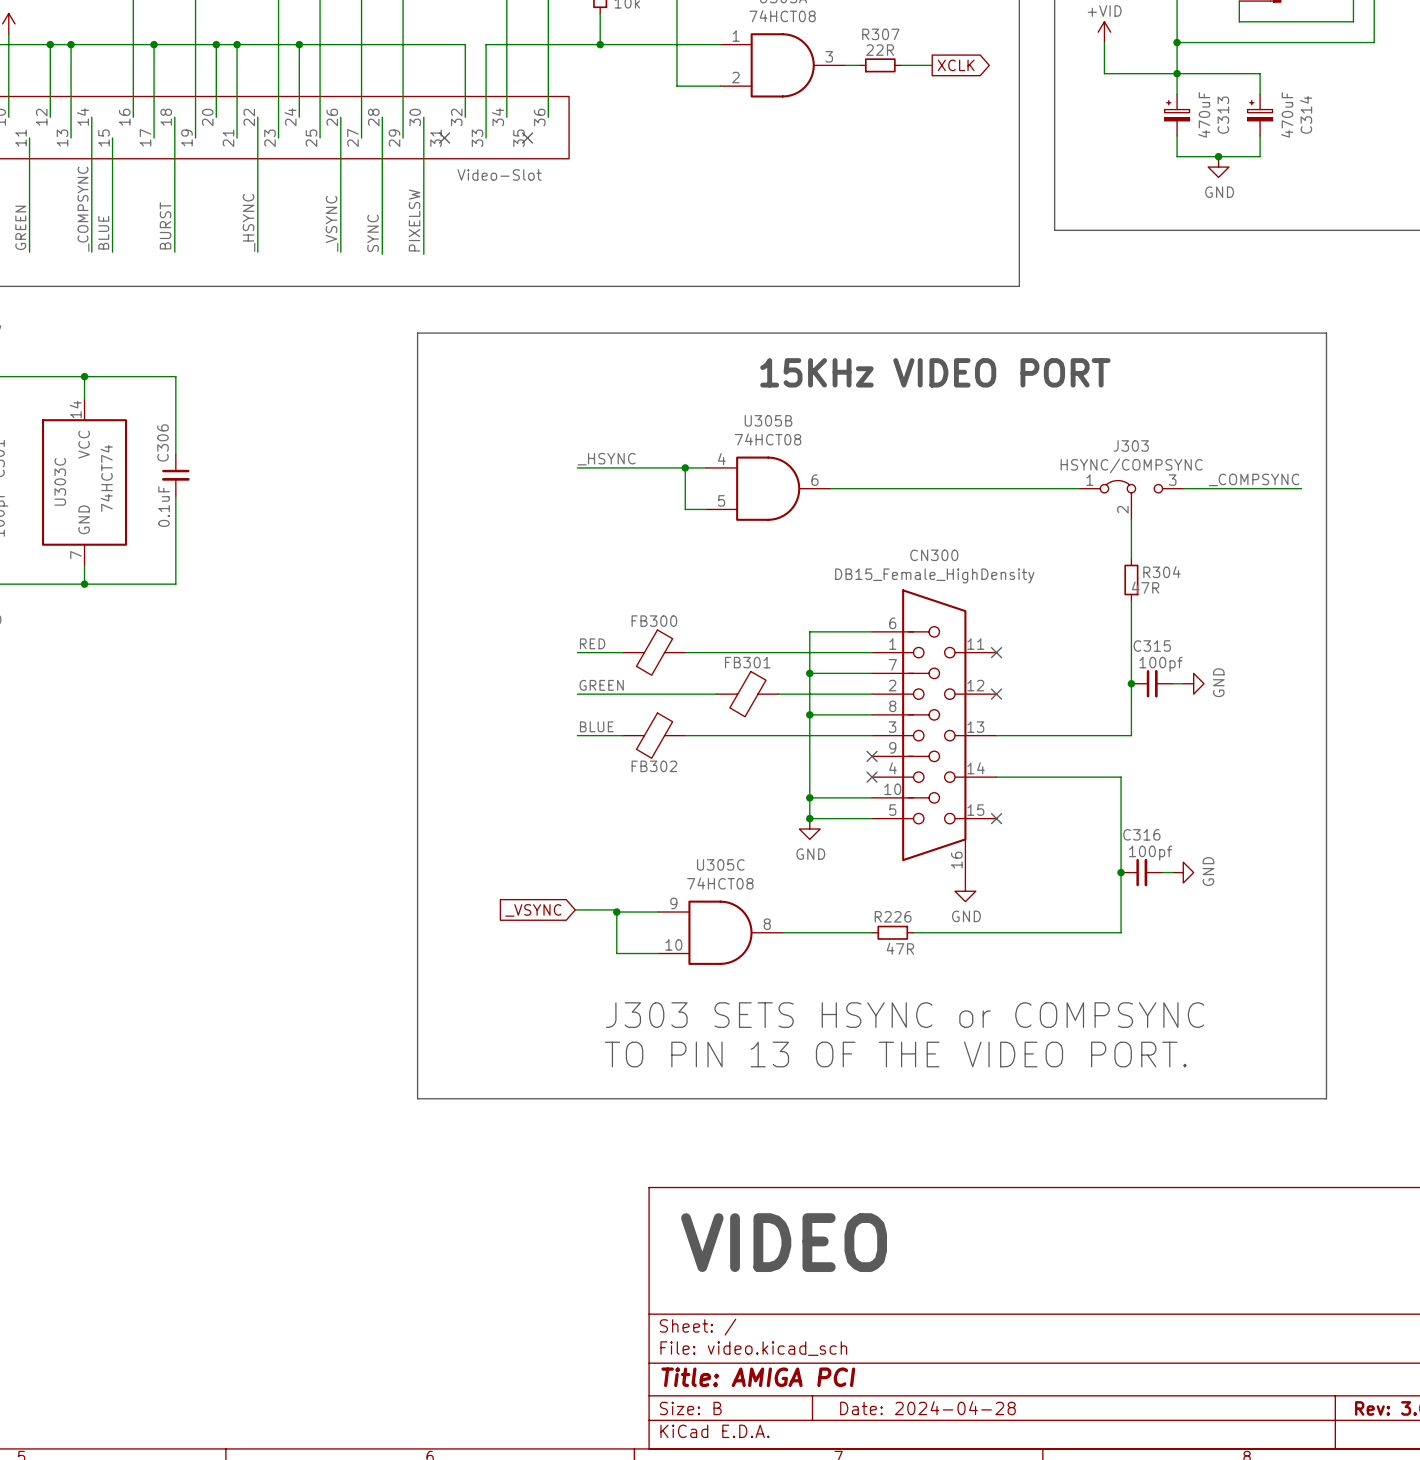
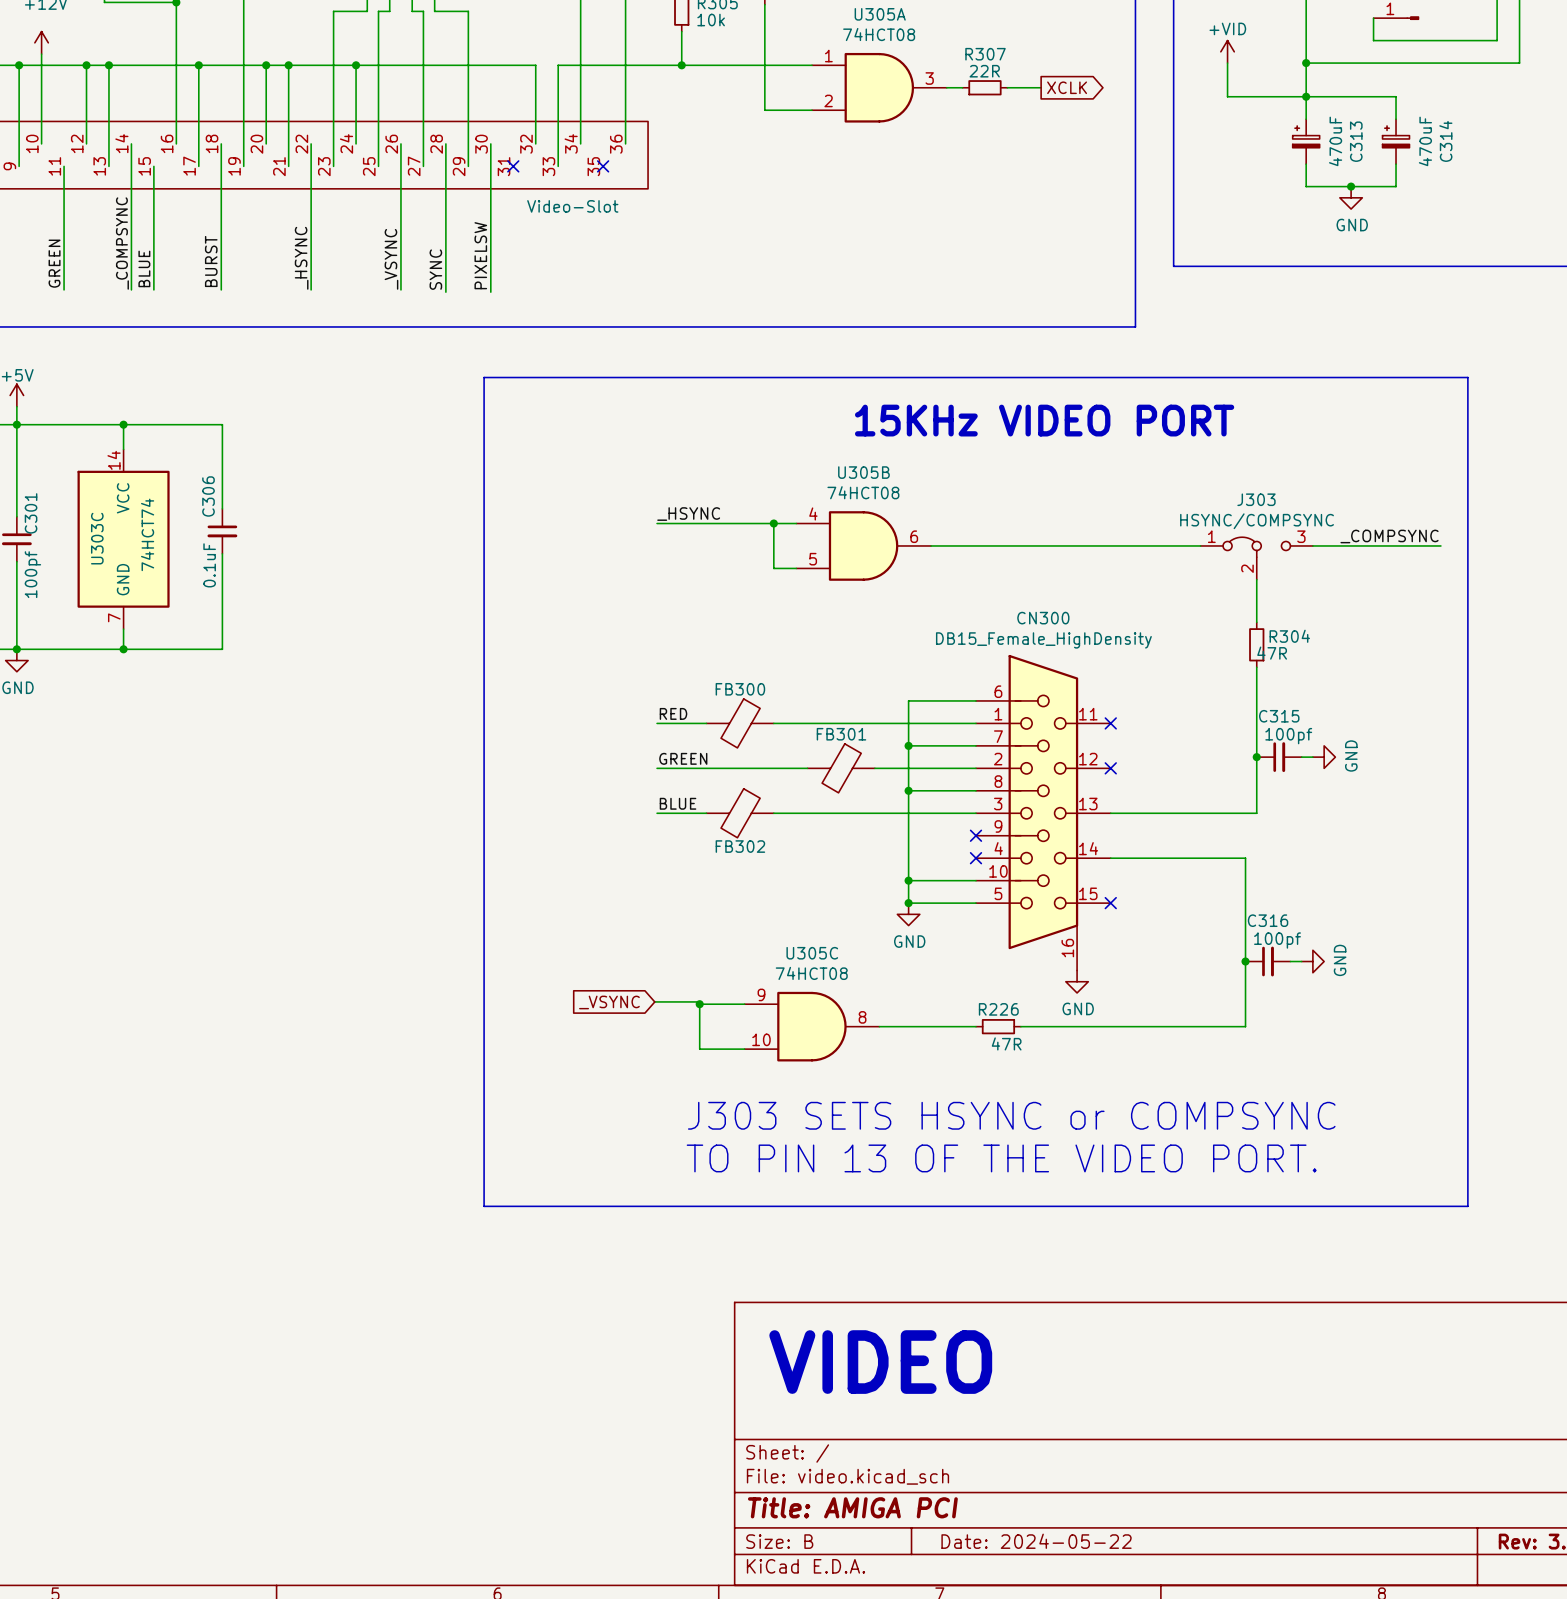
title block: Date: 2024-04-28 (927, 1408) -> Date: 2024-05-22 (1036, 1541)

